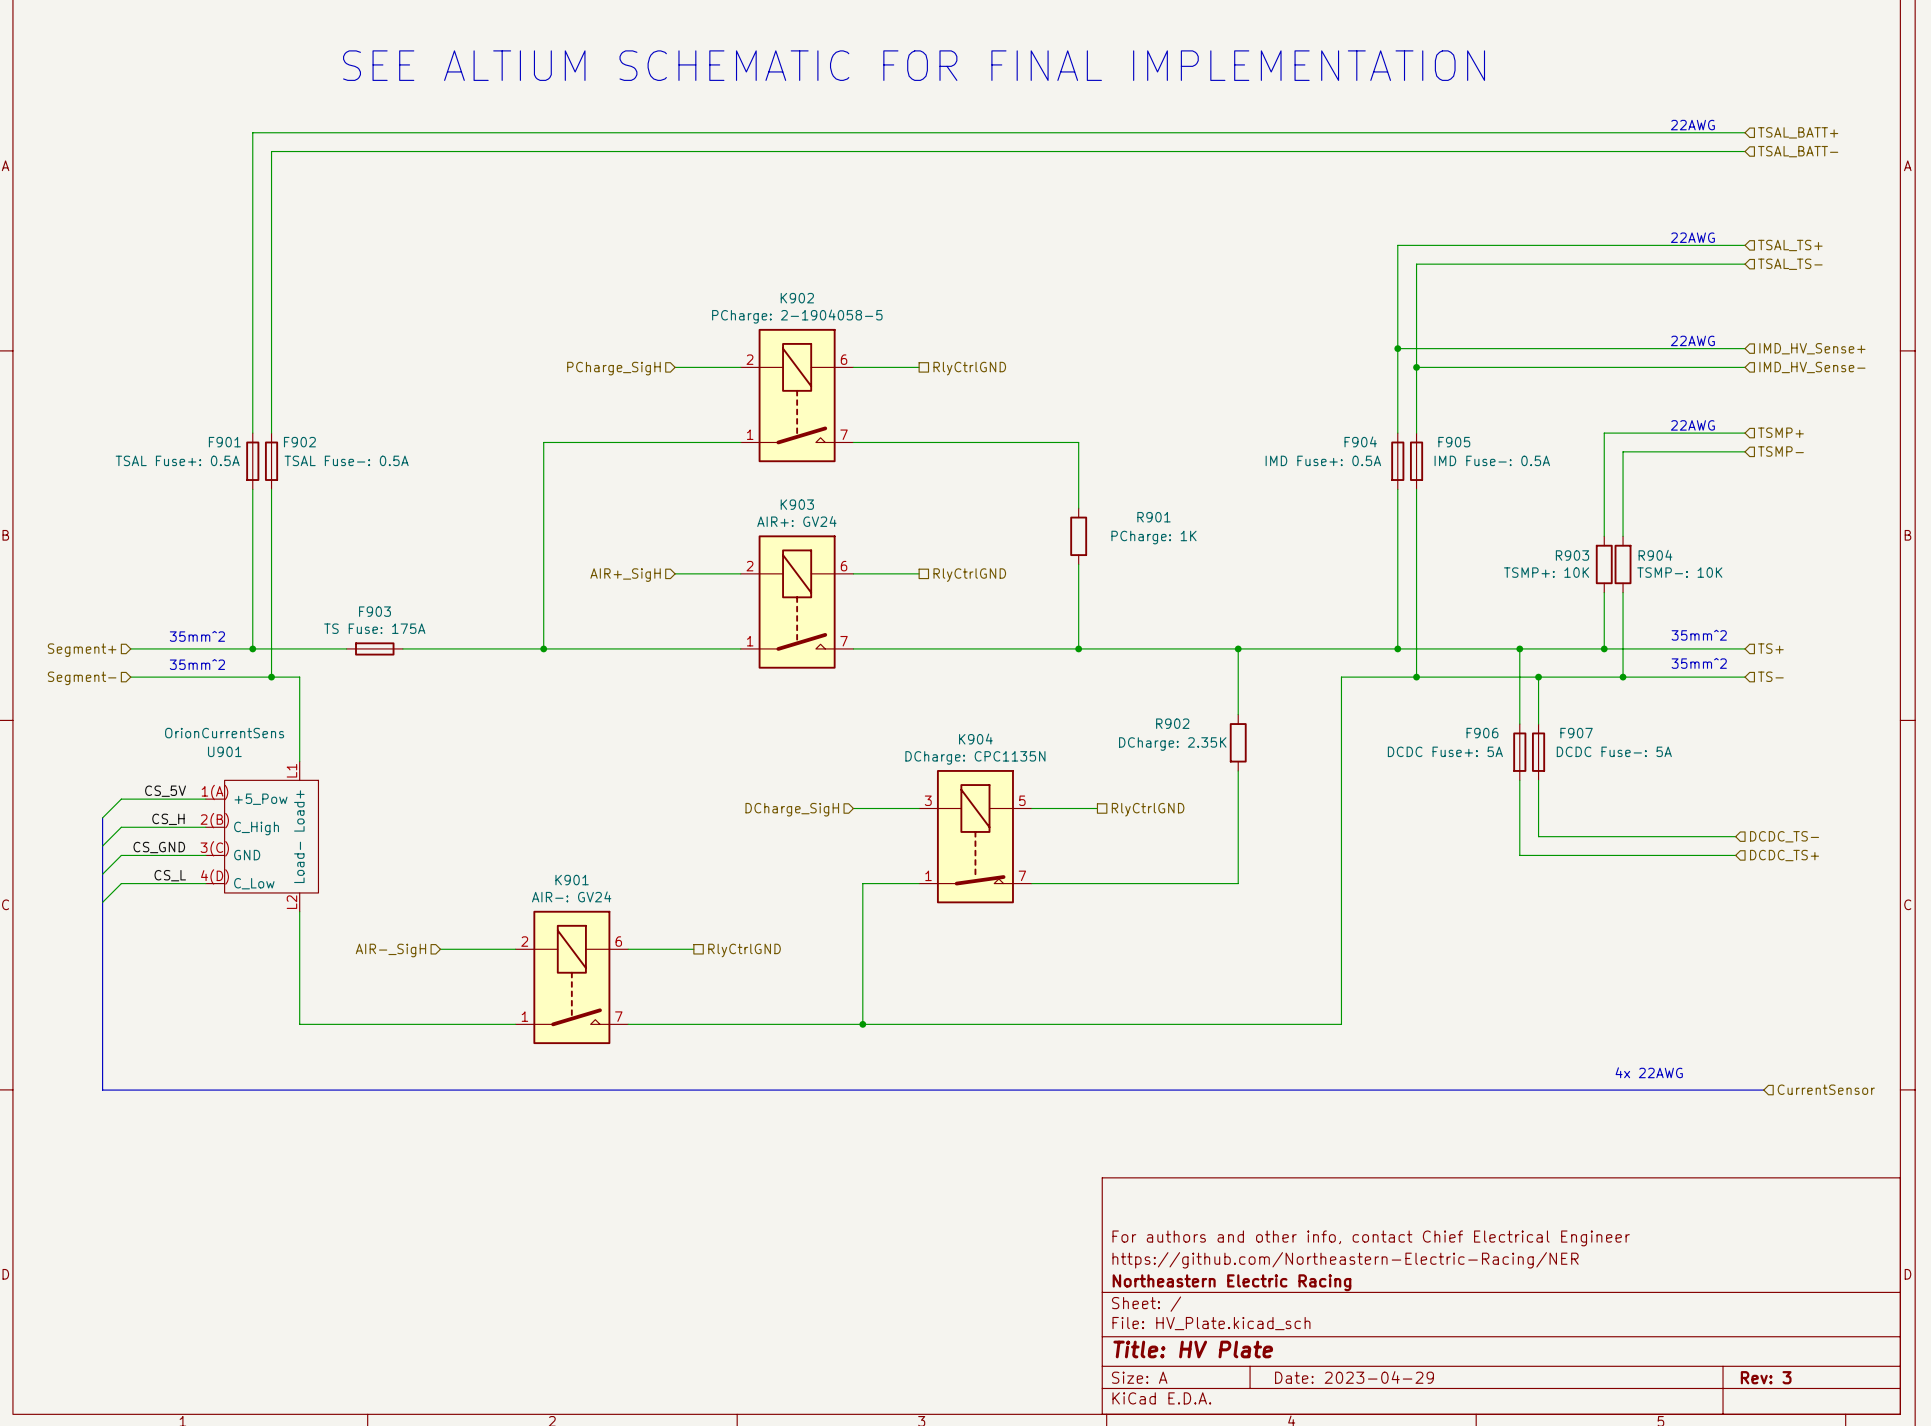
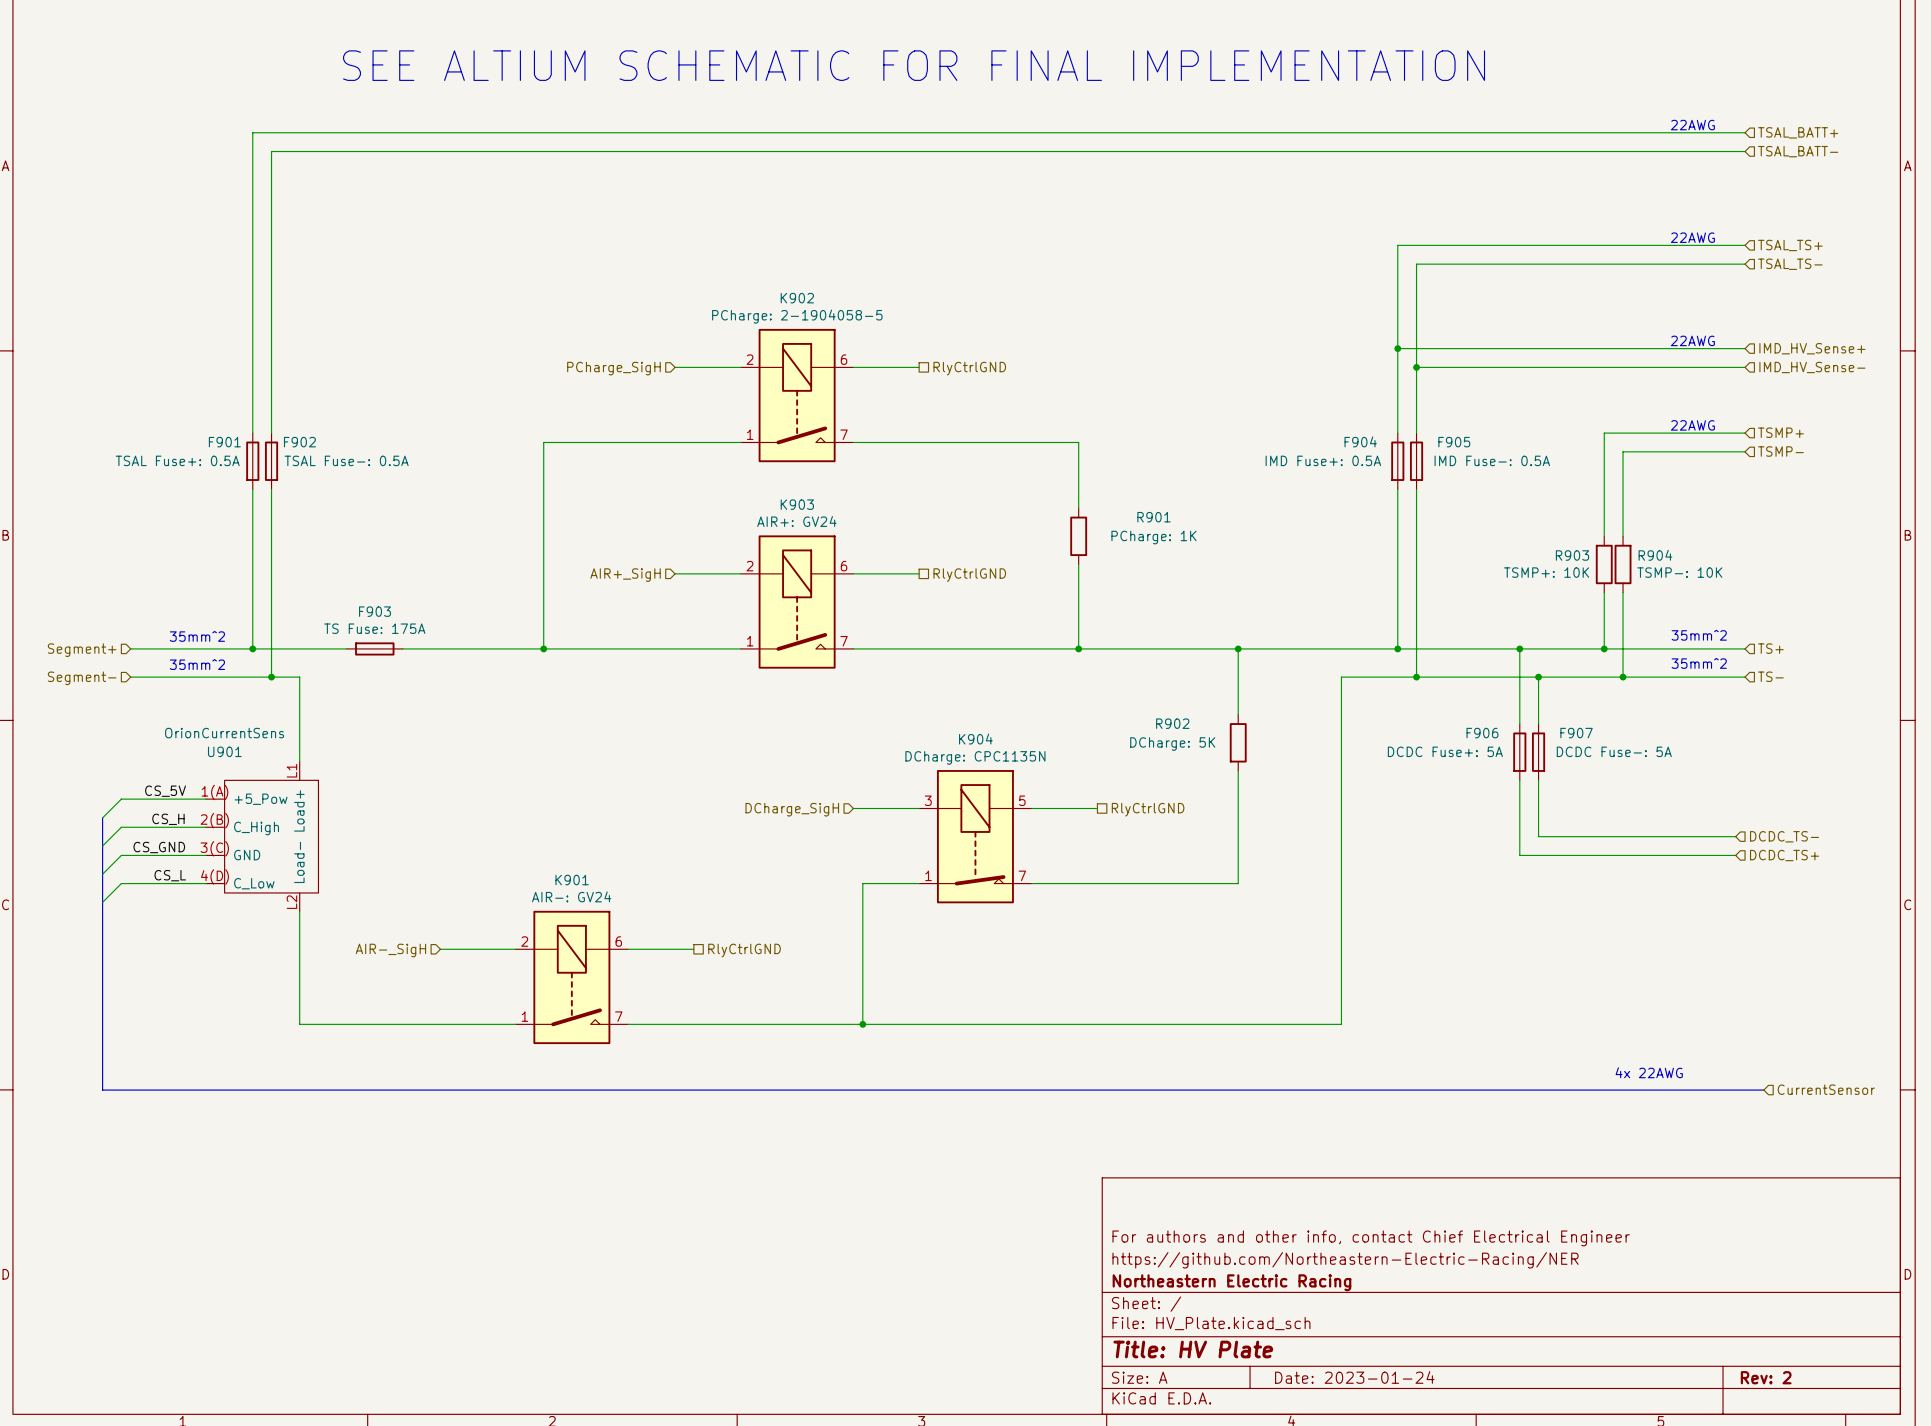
R902 value: DCharge: 2.35K (1172, 744) -> DCharge: 5K (1172, 744)
title block: Date: 2023-04-29 (1354, 1377) -> Date: 2023-01-24 (1354, 1377)
title block: Rev: 3 (1766, 1377) -> Rev: 2 (1766, 1377)

